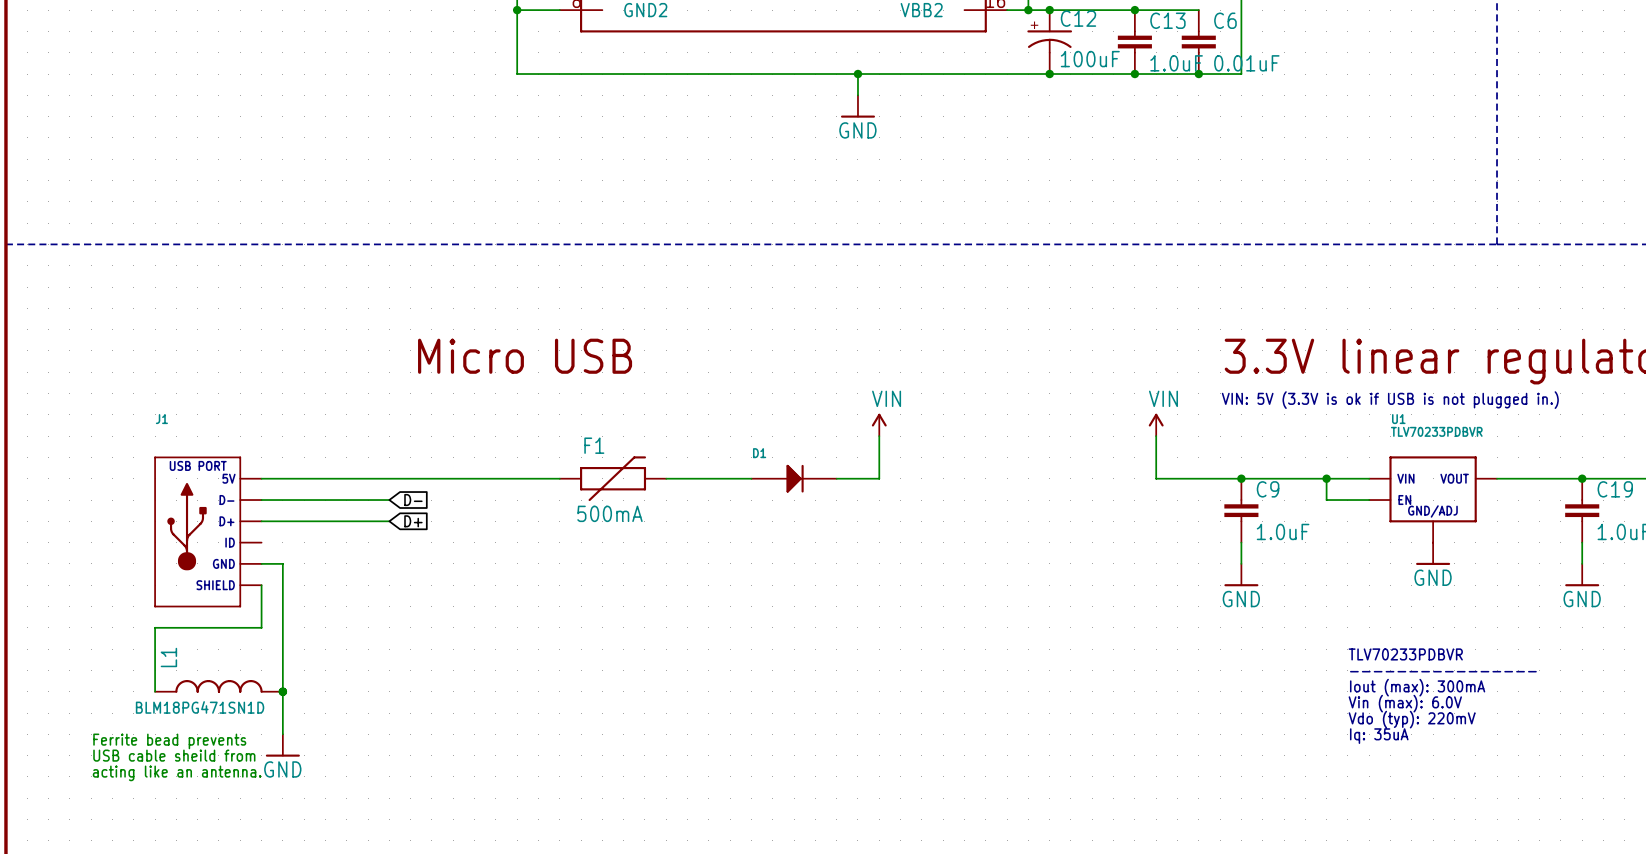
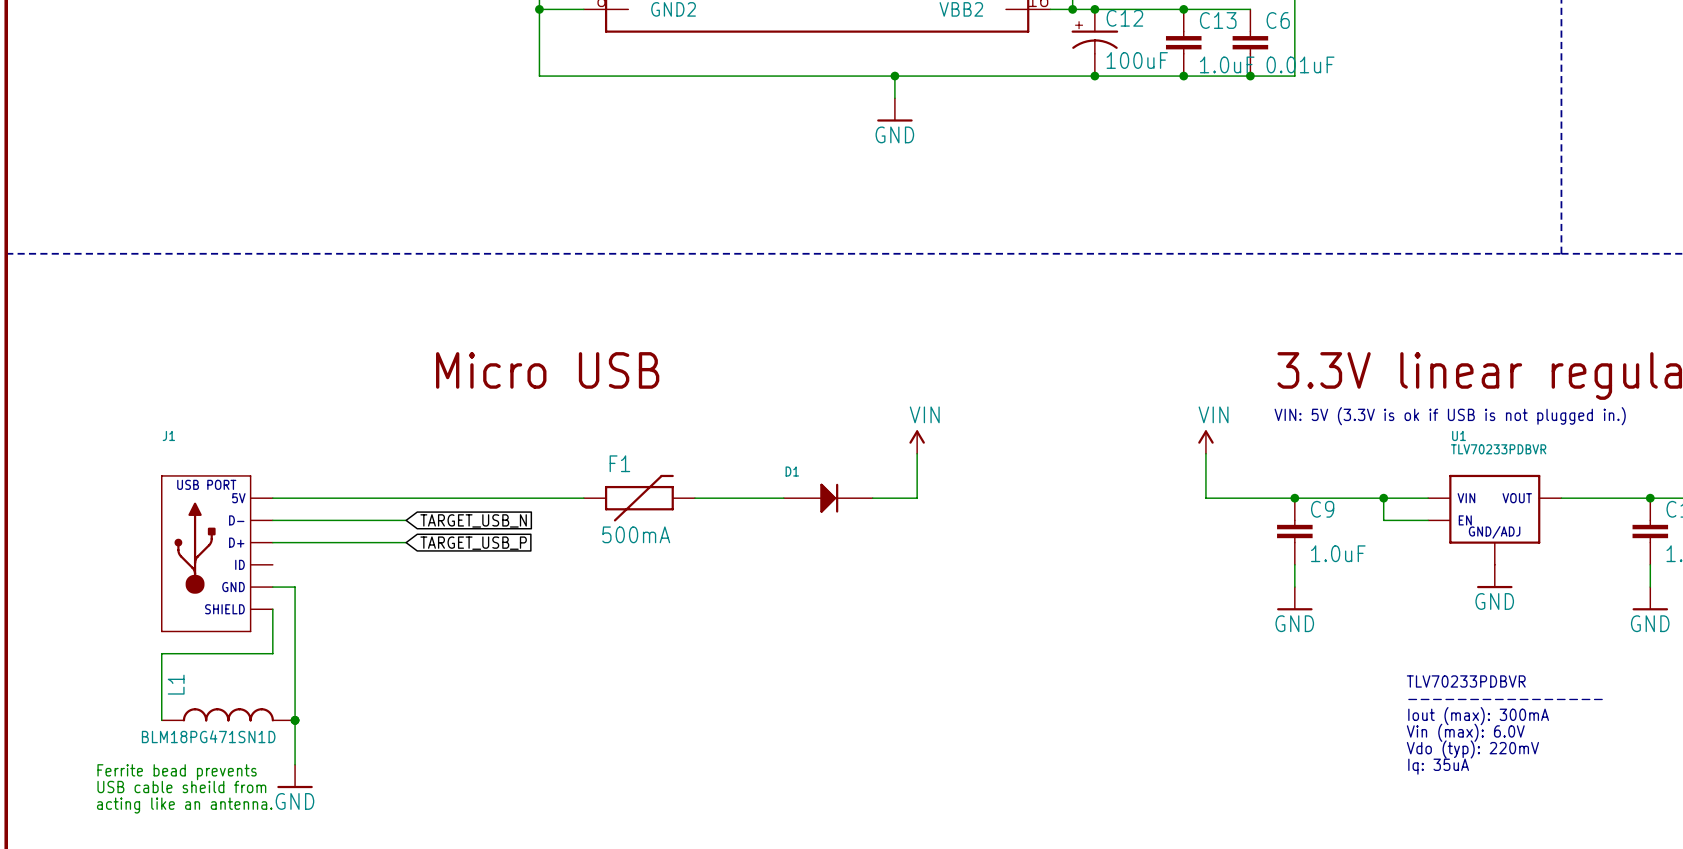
global label: D- (413, 500) -> TARGET_USB_N (473, 520)
global label: D+ (413, 521) -> TARGET_USB_P (473, 543)

